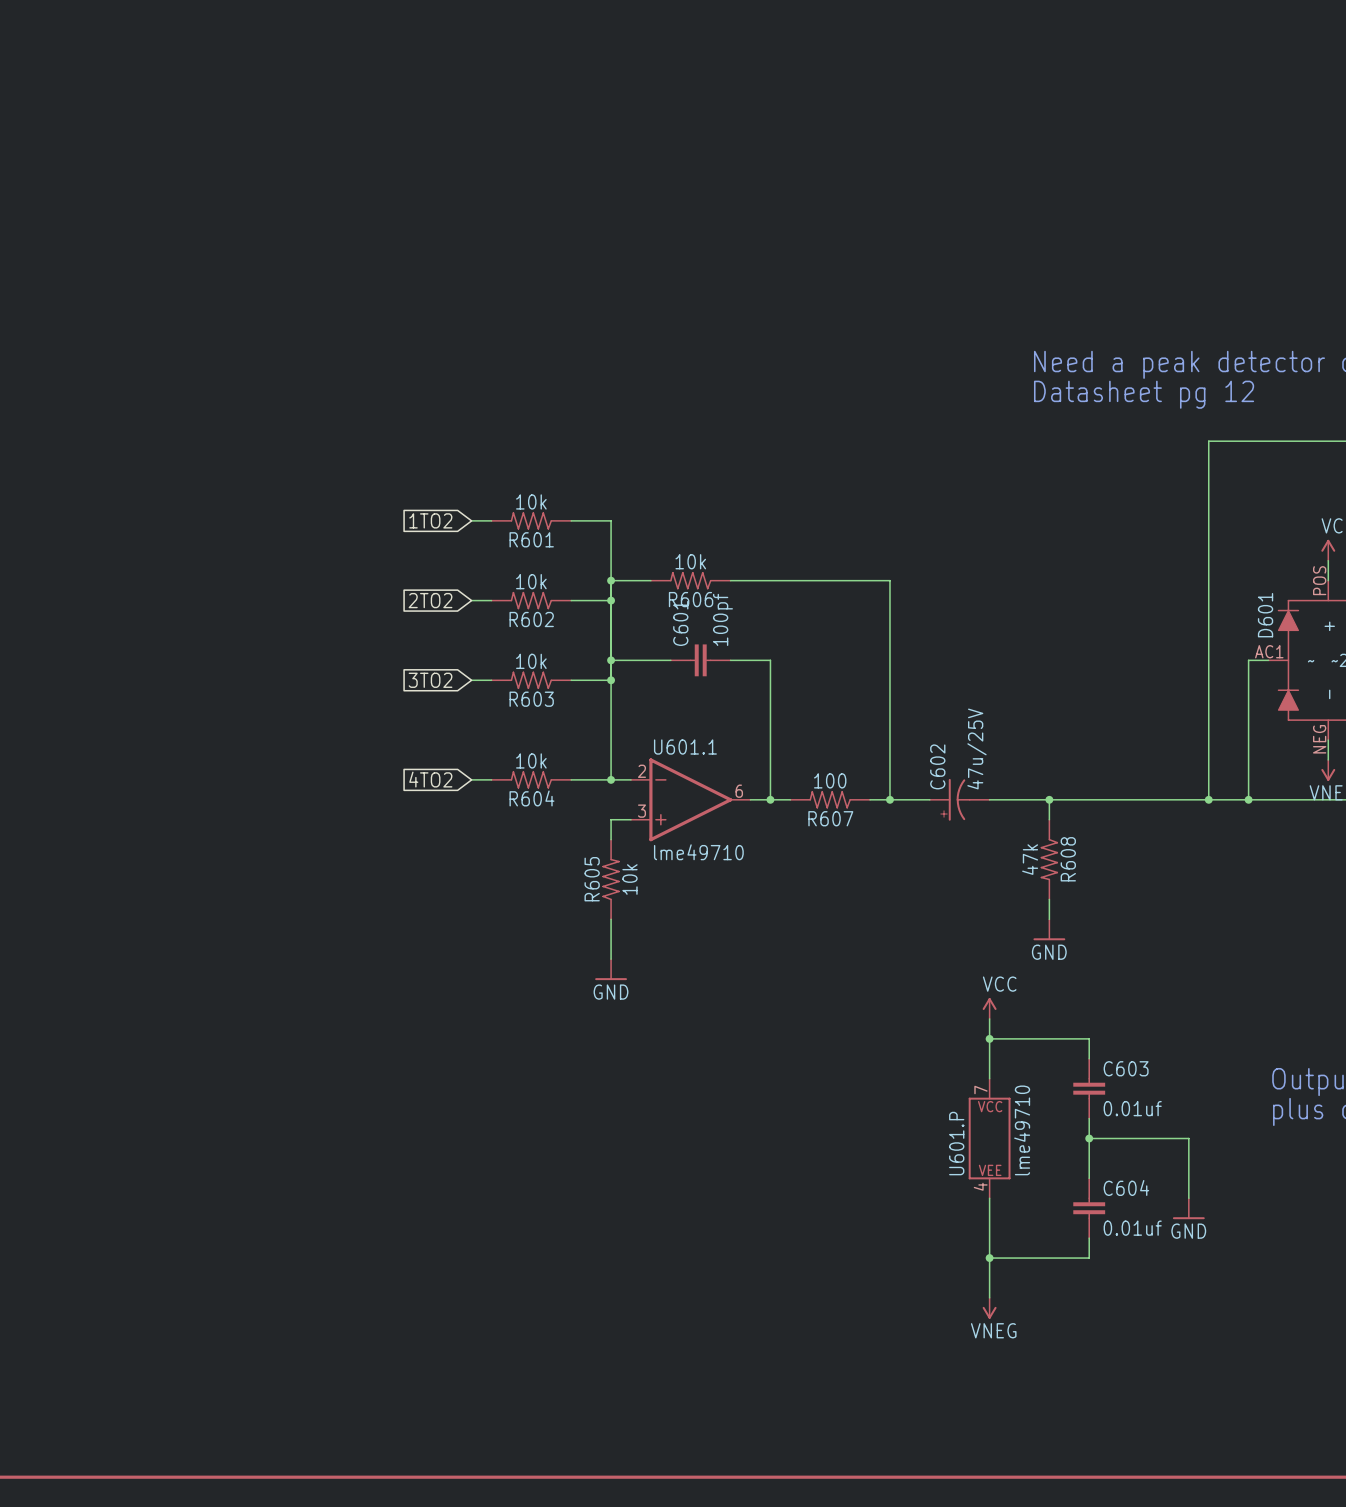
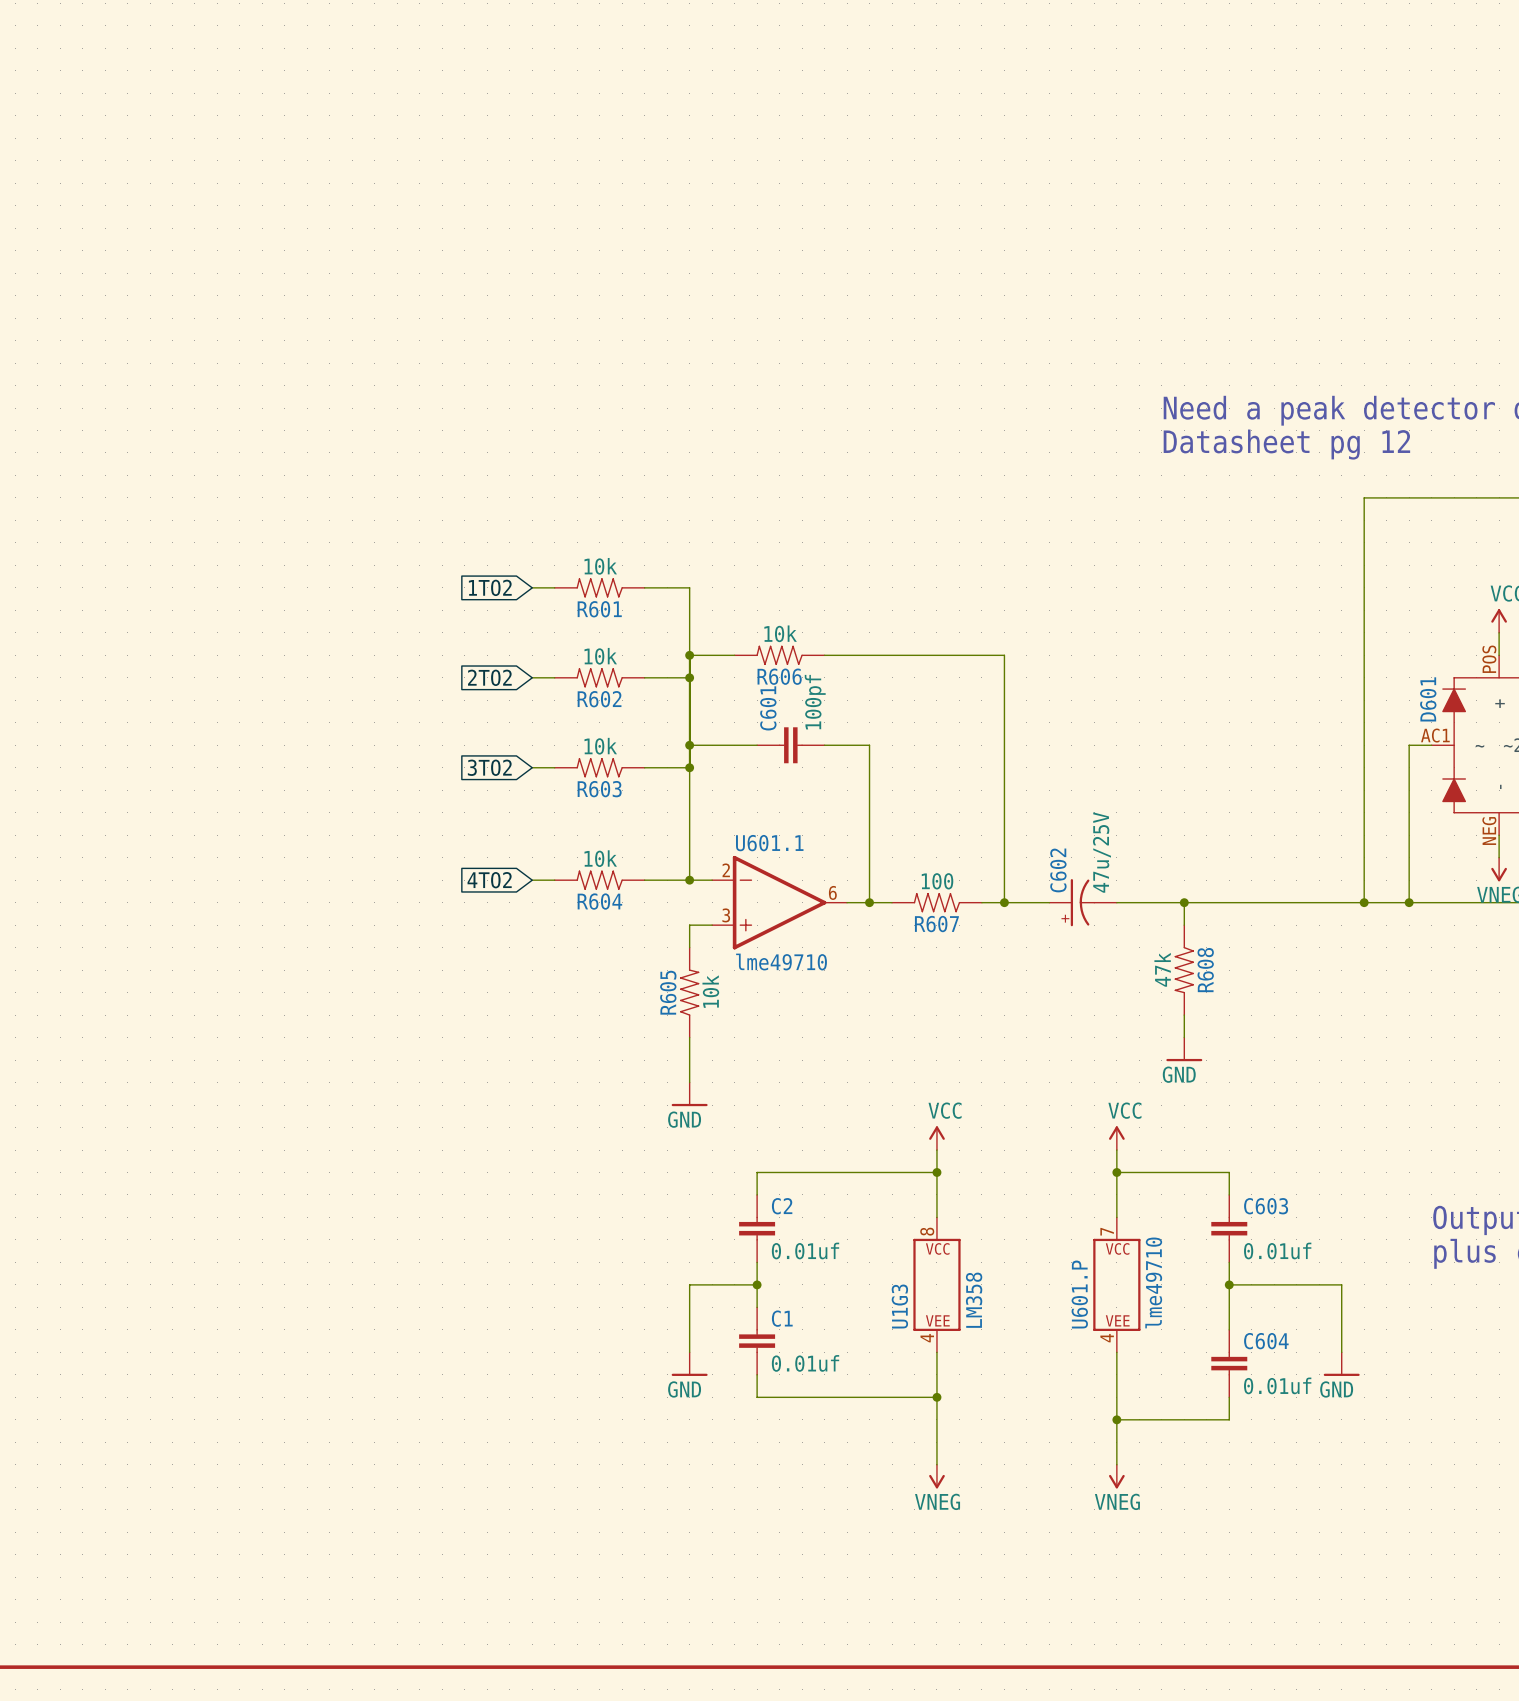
power symbol: none -> VCC (936, 1138)
wire: none -> (936, 1150) (936, 1217)
wire: none -> (936, 1172) (757, 1172) (757, 1194)
junction: none -> (936, 1172)
C2: none -> 0.01uf (757, 1228)
wire: none -> (757, 1262) (757, 1307)
wire: none -> (757, 1284) (689, 1284) (689, 1352)
junction: none -> (757, 1284)
U1G3: none -> LM358 (936, 1284)
C1: none -> 0.01uf (757, 1341)
wire: none -> (936, 1352) (936, 1464)
power symbol: none -> GND (689, 1364)
wire: none -> (757, 1374) (757, 1397) (936, 1397)
junction: none -> (936, 1397)
power symbol: none -> VNEG (936, 1476)

